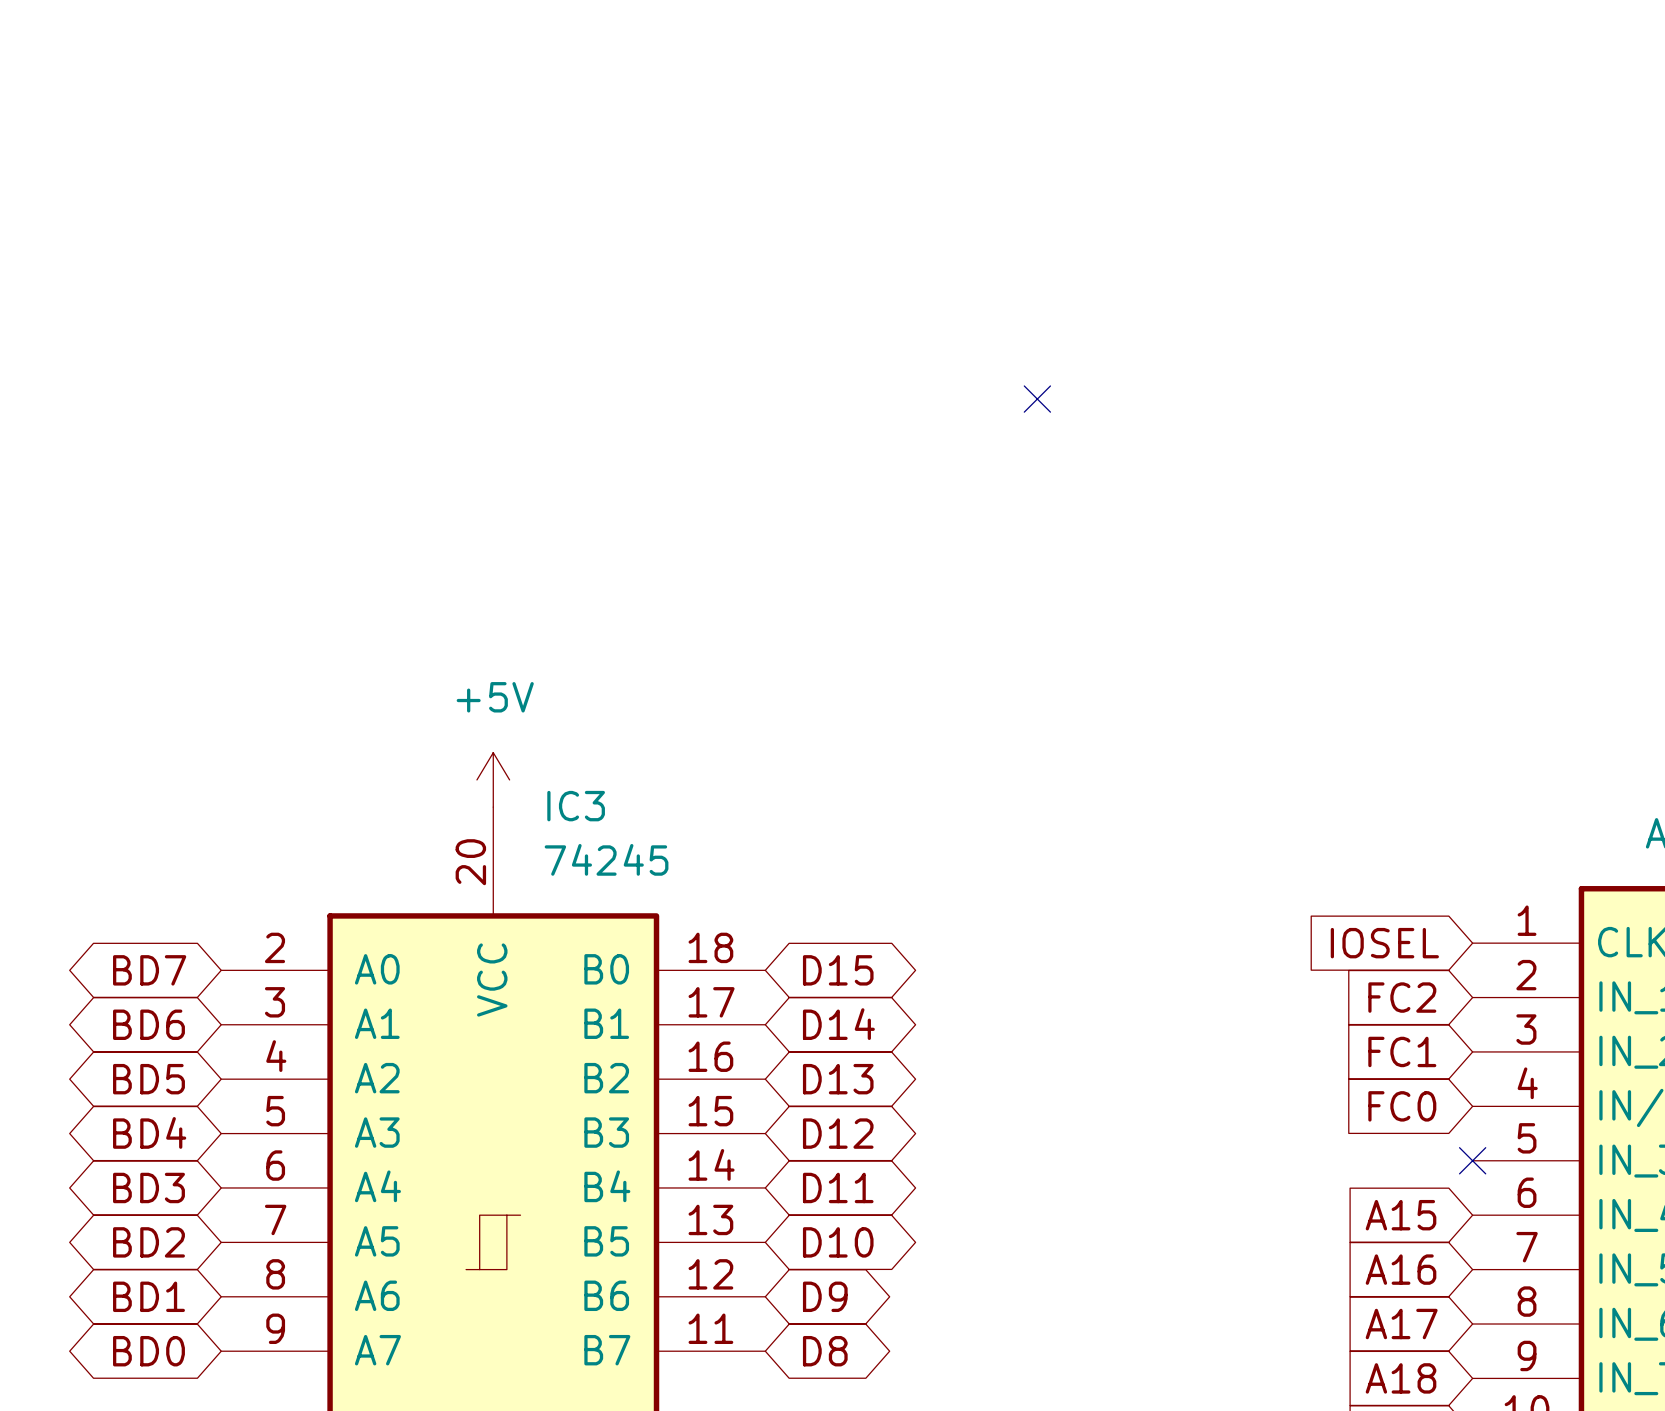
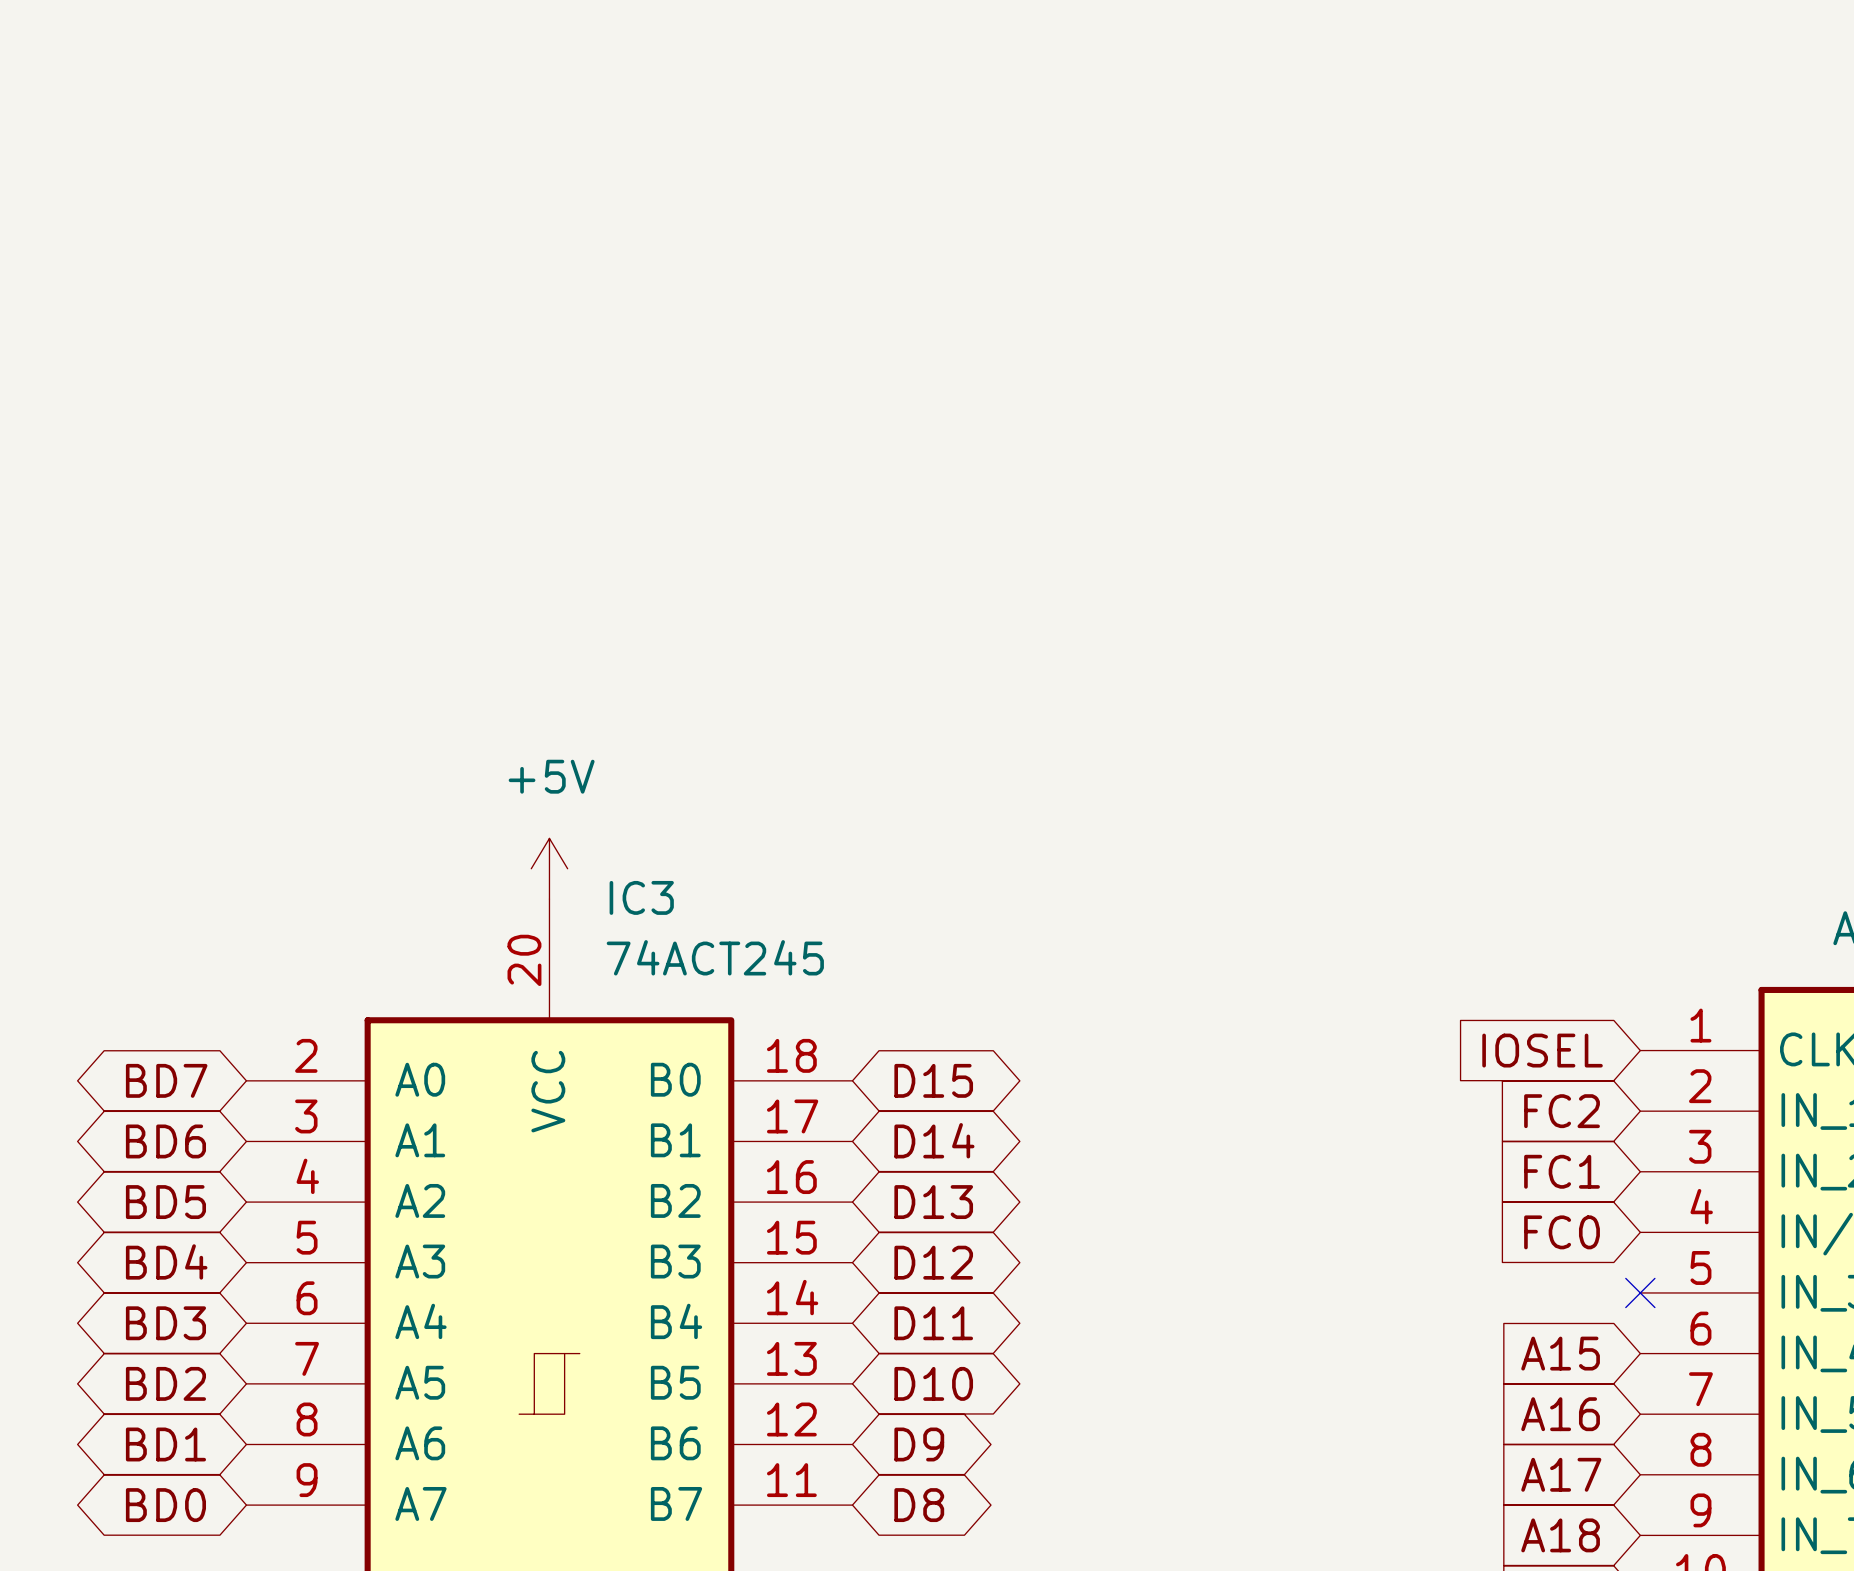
no-connect mark: (1037, 399) -> none
IC3 value: 74245 (606, 859) -> 74ACT245 (715, 957)

